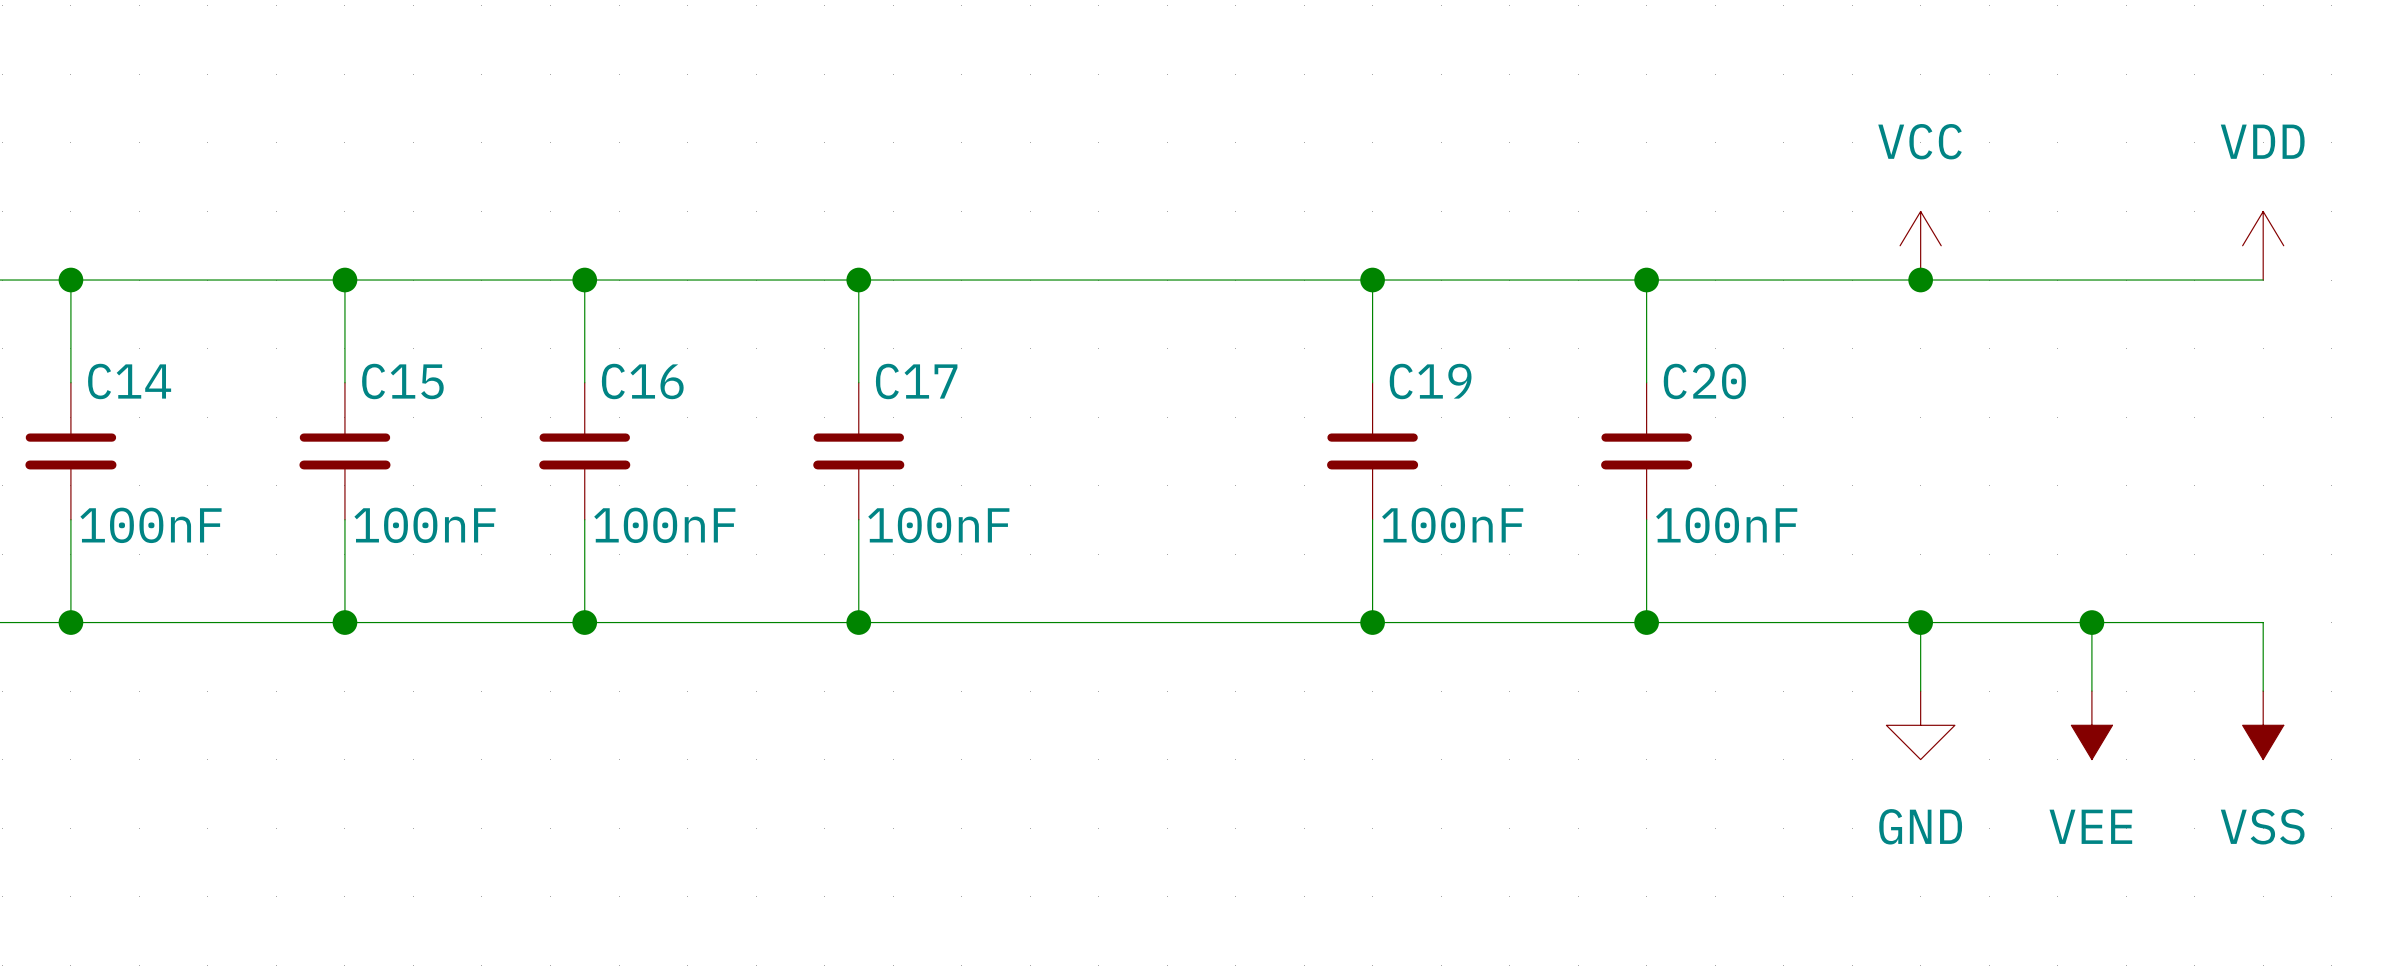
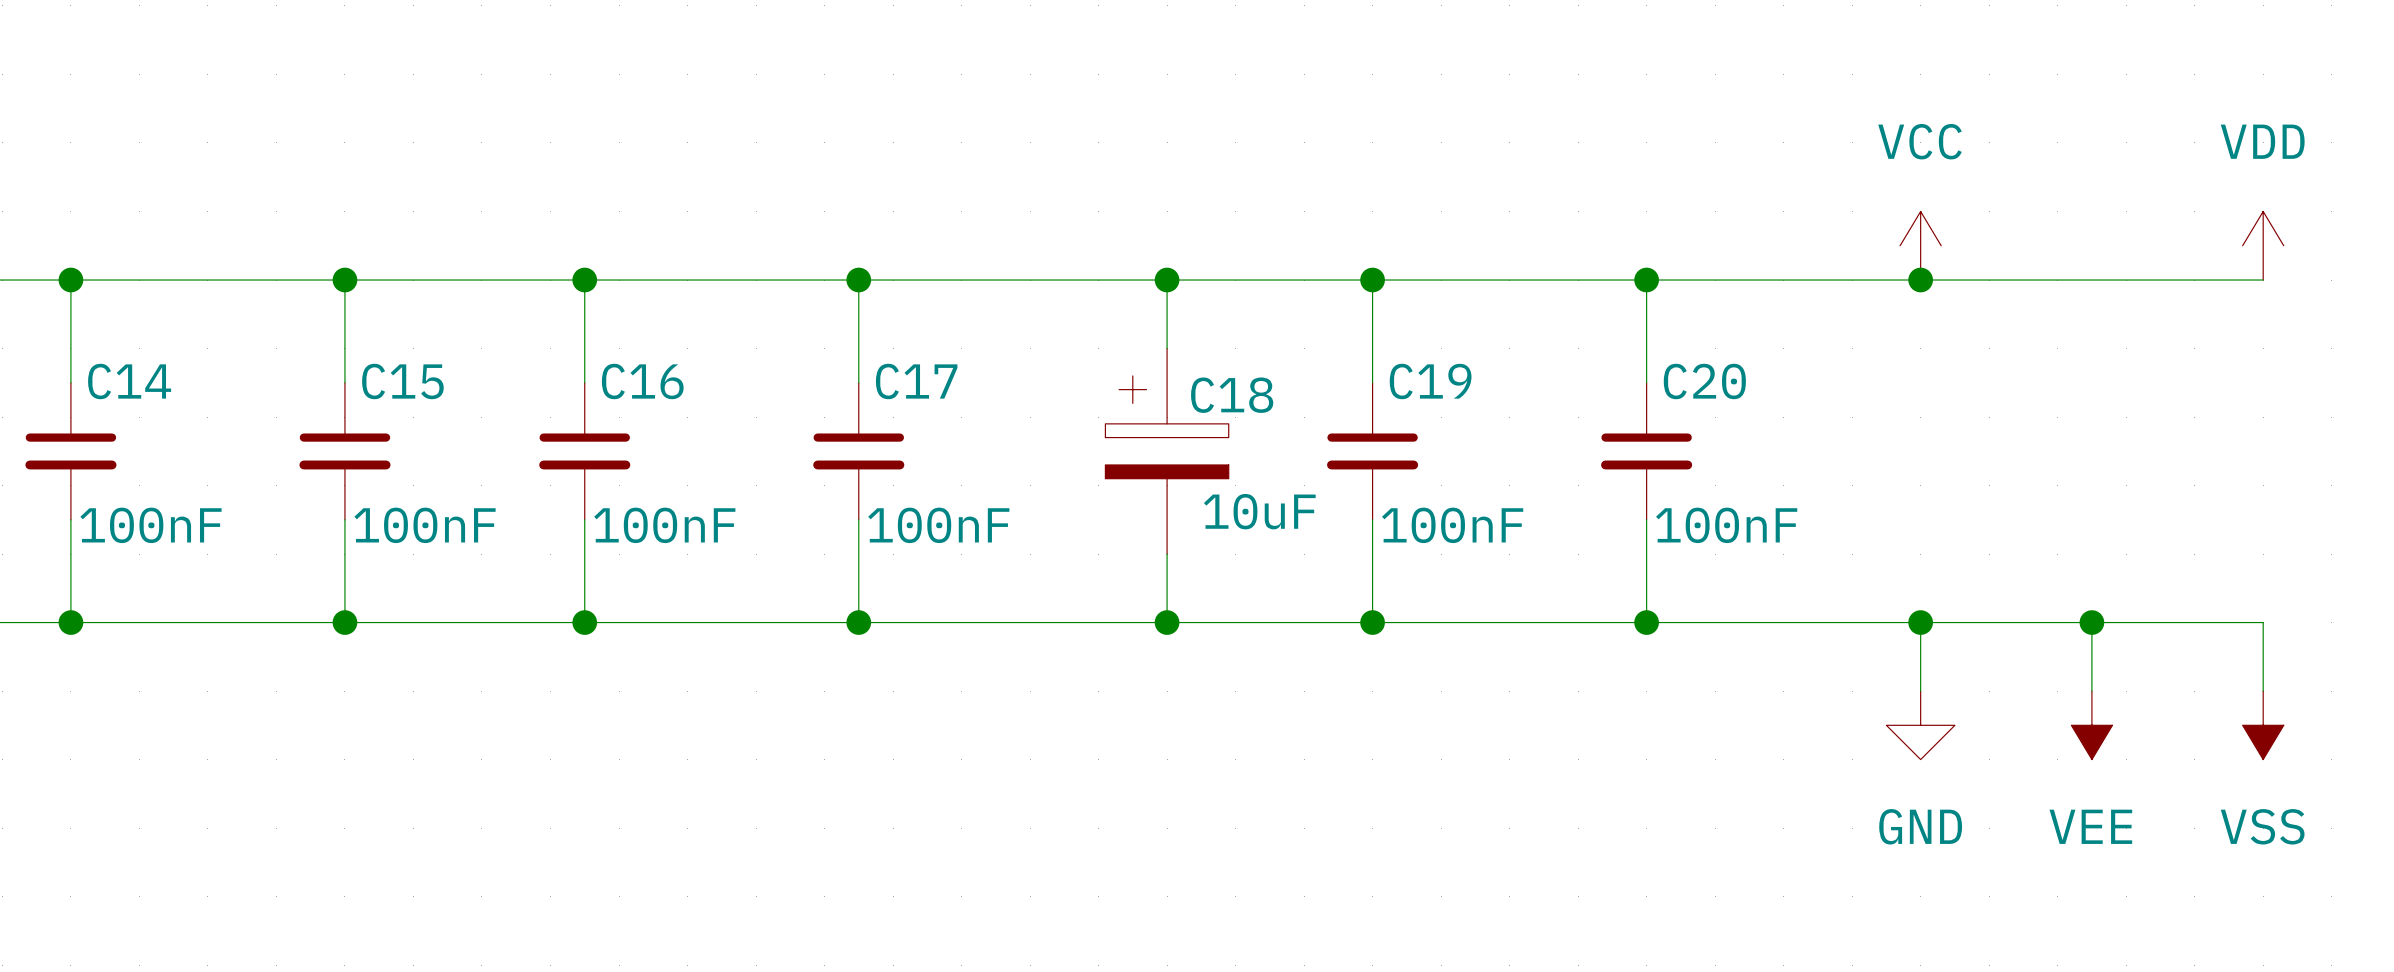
wire: none -> (1167, 280) (1167, 348)
junction: none -> (1167, 280)
C18: none -> 10uF (1167, 451)
wire: none -> (1167, 554) (1167, 622)
junction: none -> (1167, 622)

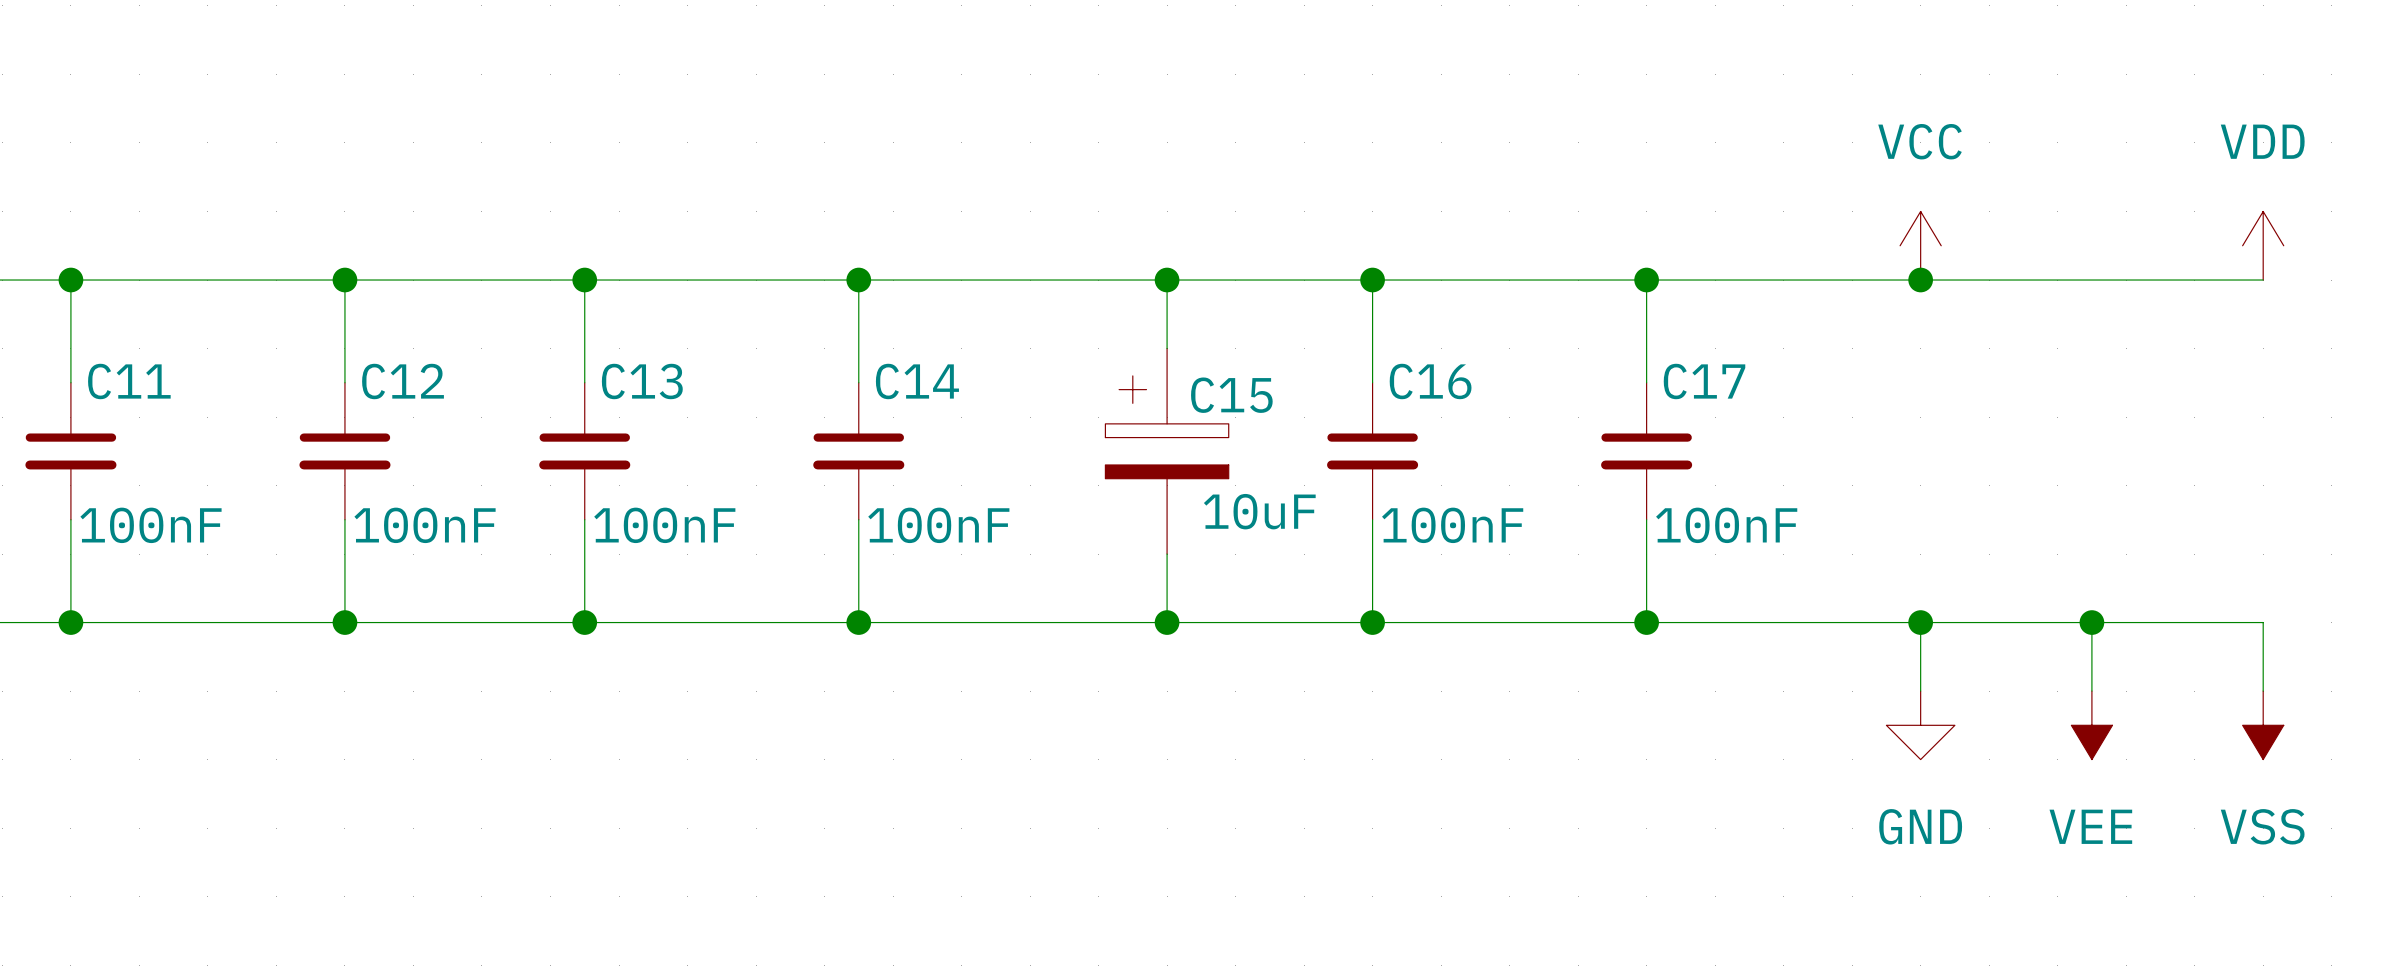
C14 name: C14 (129, 381) -> C11 (129, 381)
C15 name: C15 (402, 381) -> C12 (403, 381)
C16 name: C16 (642, 381) -> C13 (642, 381)
C17 name: C17 (916, 381) -> C14 (917, 381)
C19 name: C19 (1430, 381) -> C16 (1430, 381)
C20 name: C20 (1704, 381) -> C17 (1704, 381)
C18 name: C18 (1232, 395) -> C15 (1231, 395)

